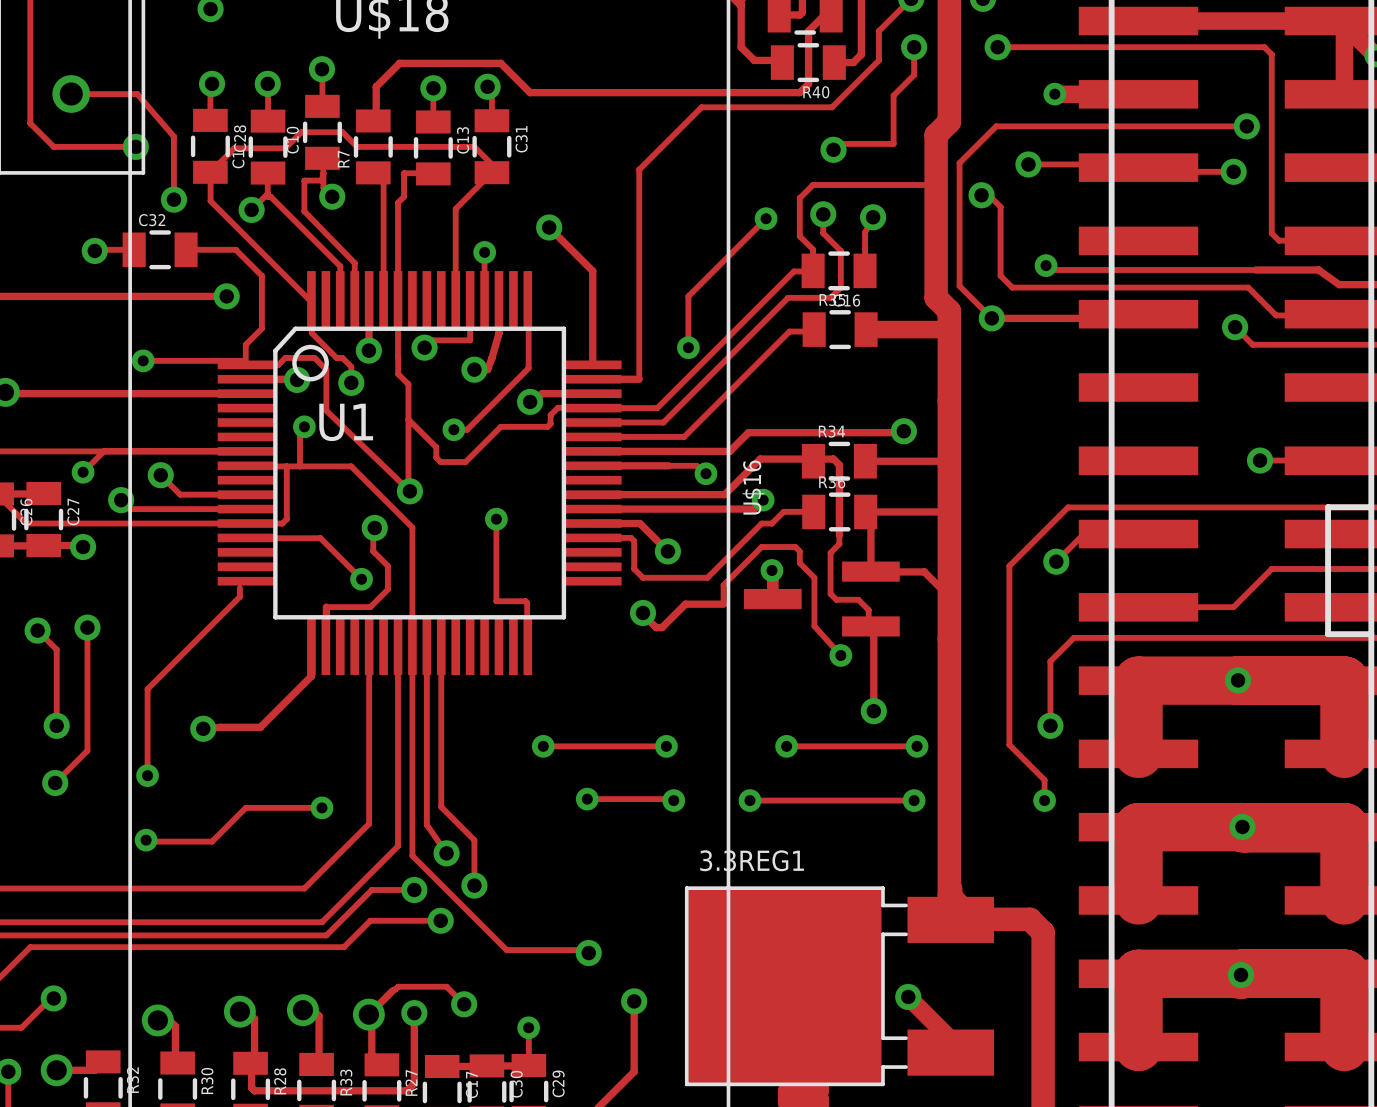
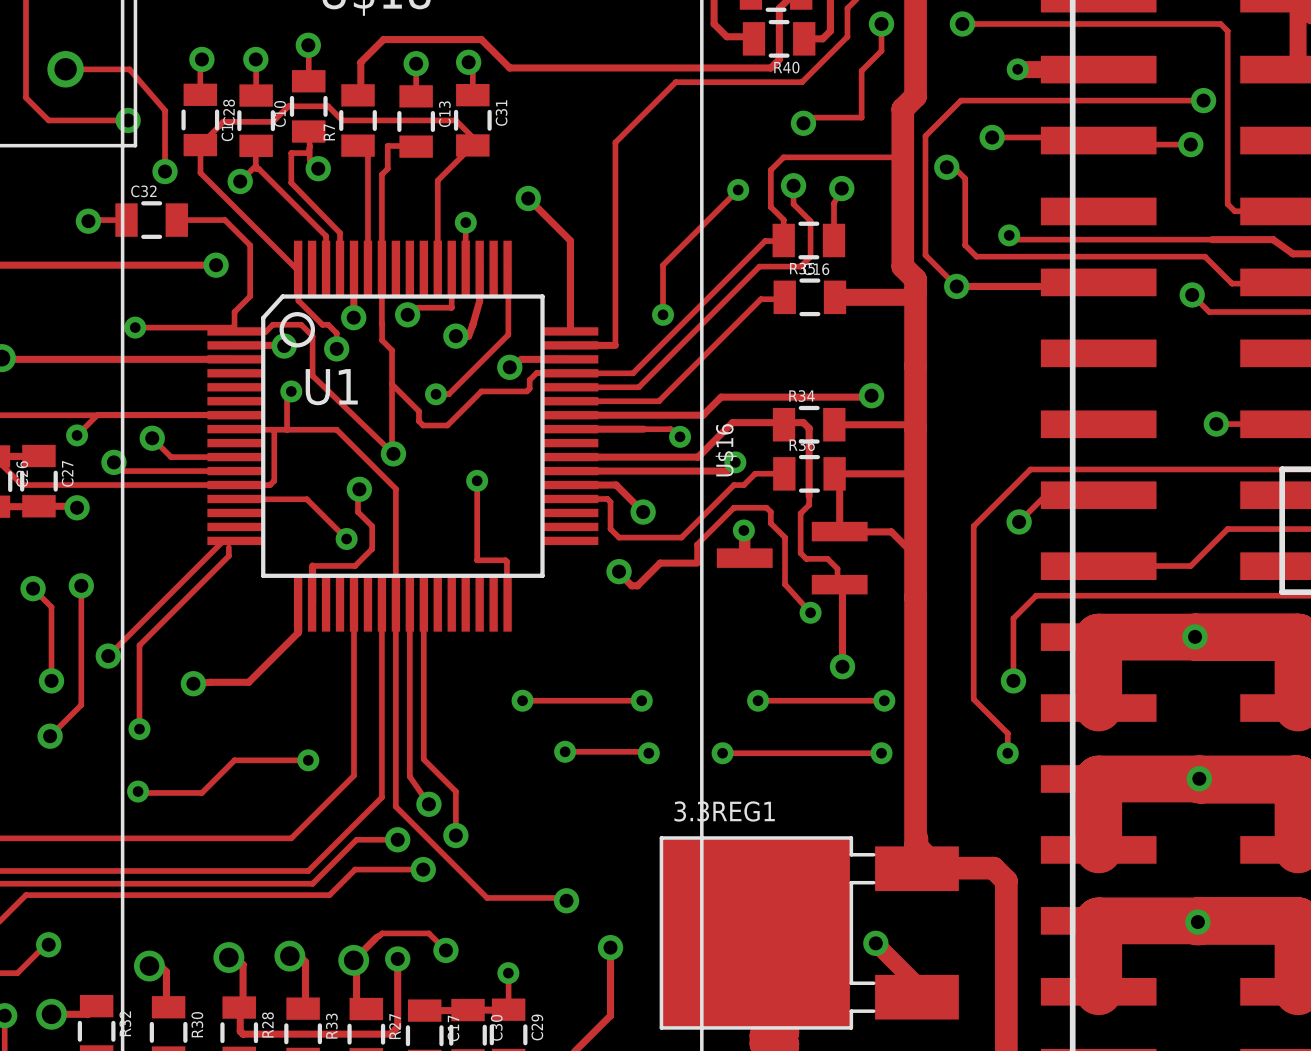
track: none -> (221, 542) (108, 656)
via: none -> (108, 656)

